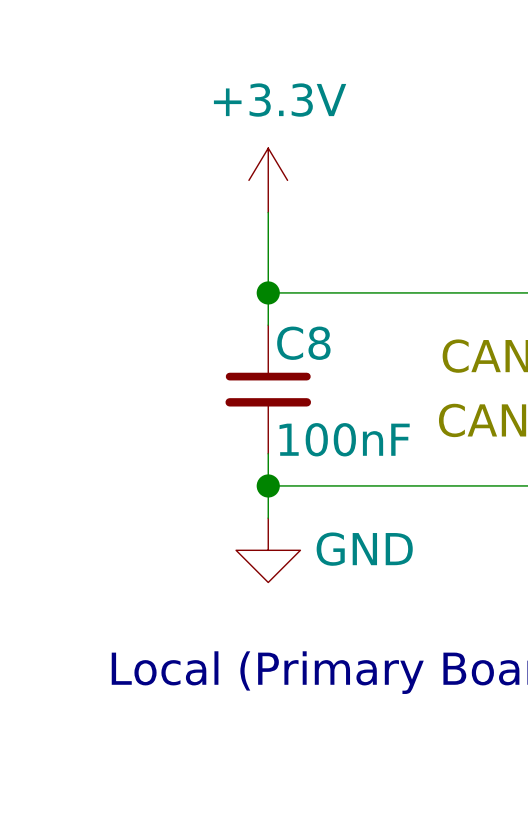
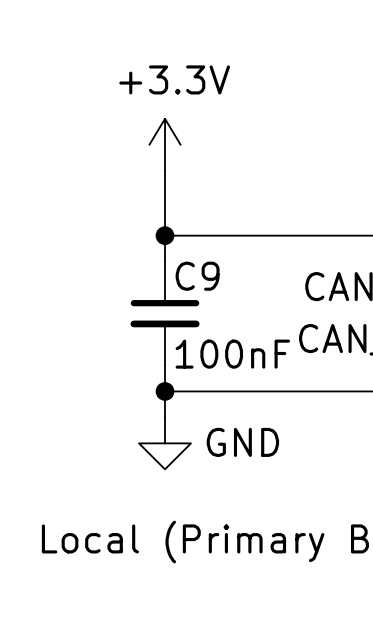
C8 name: C8 (303, 343) -> C9 (197, 276)

